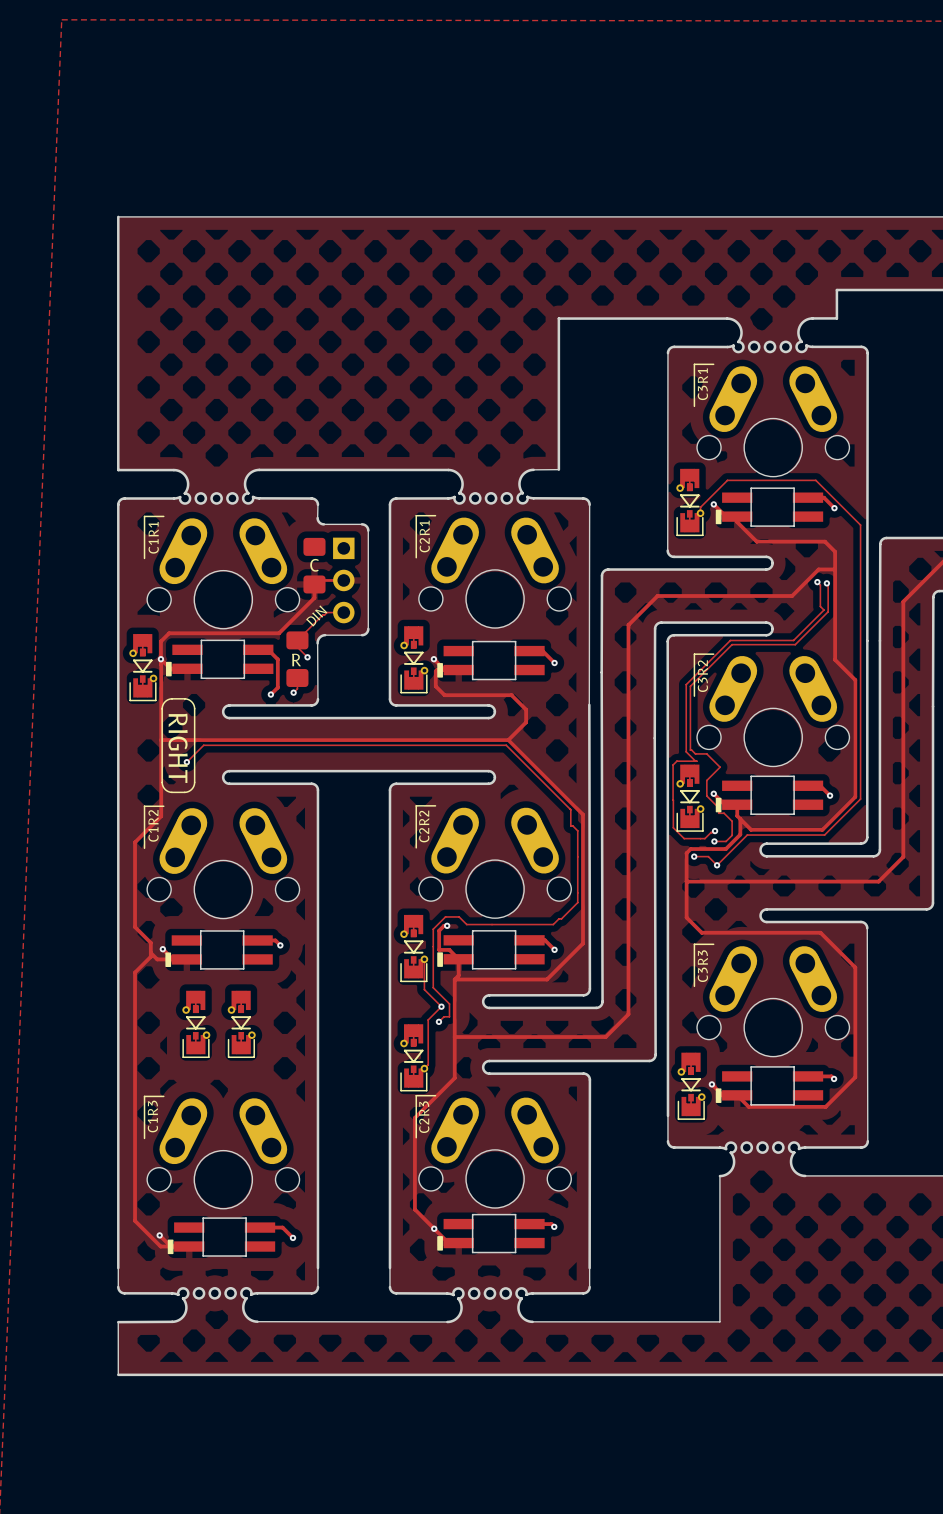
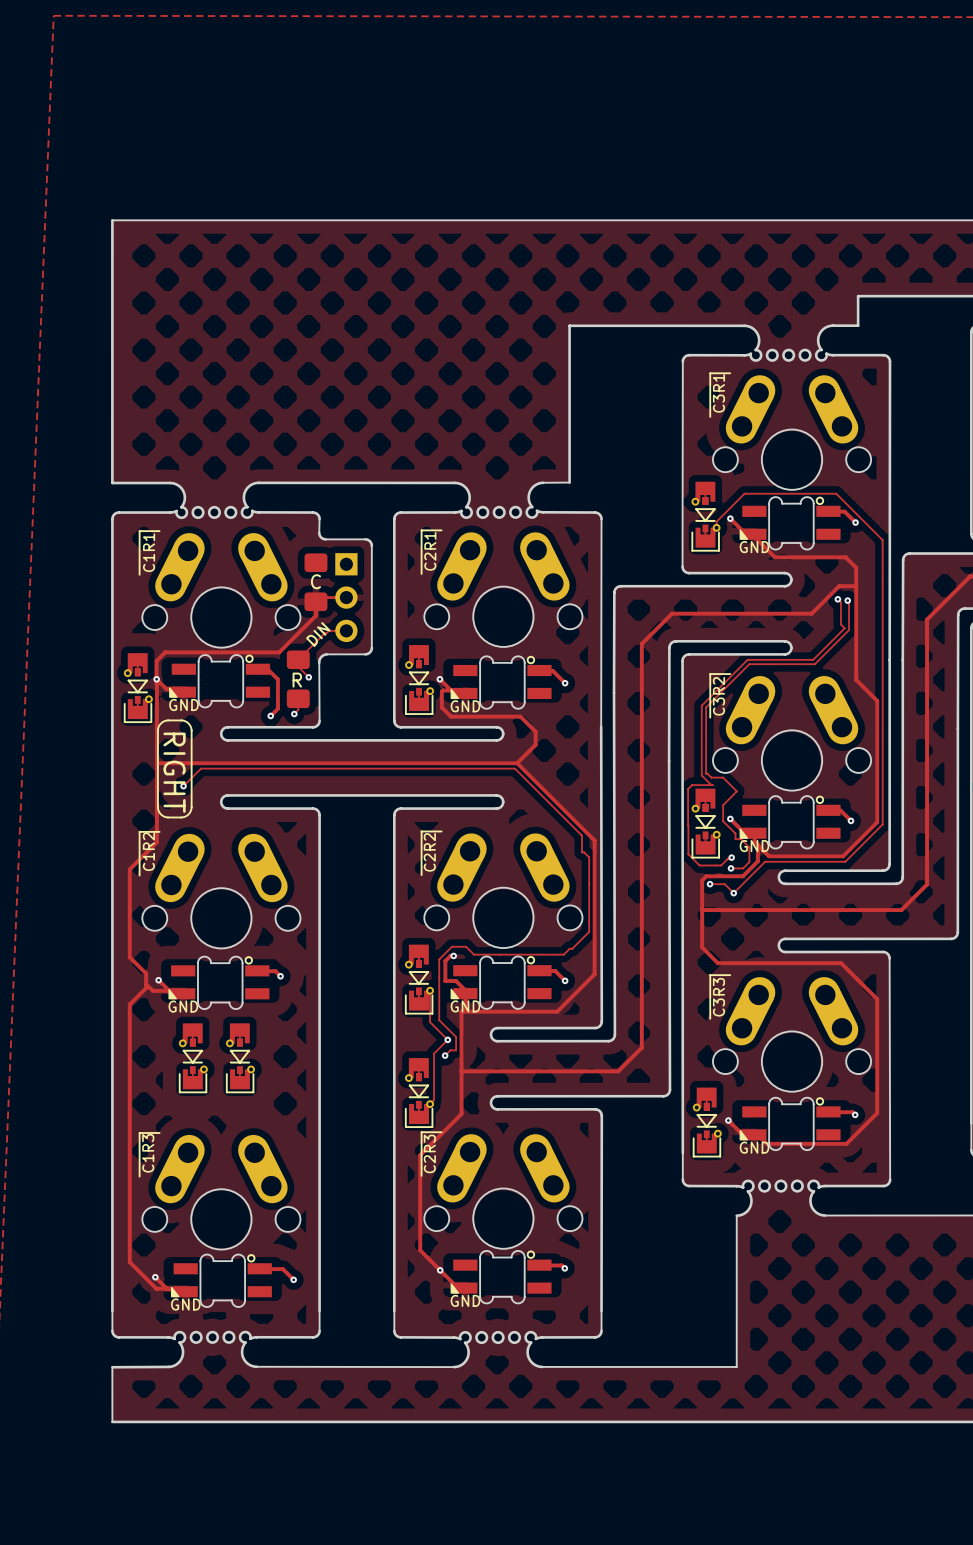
part footprint: [715, 487, 824, 527] -> [739, 496, 841, 551]
part footprint: [166, 639, 274, 680] -> [169, 654, 271, 709]
part footprint: [437, 640, 545, 681] -> [450, 655, 552, 710]
part footprint: [715, 775, 824, 815] -> [739, 795, 841, 850]
part footprint: [165, 930, 273, 970] -> [168, 955, 270, 1010]
part footprint: [437, 930, 545, 970] -> [450, 955, 552, 1010]
part footprint: [715, 1066, 824, 1106] -> [739, 1097, 841, 1151]
part footprint: [437, 1213, 545, 1254] -> [450, 1250, 552, 1305]
part footprint: [167, 1217, 276, 1257] -> [170, 1253, 272, 1308]

